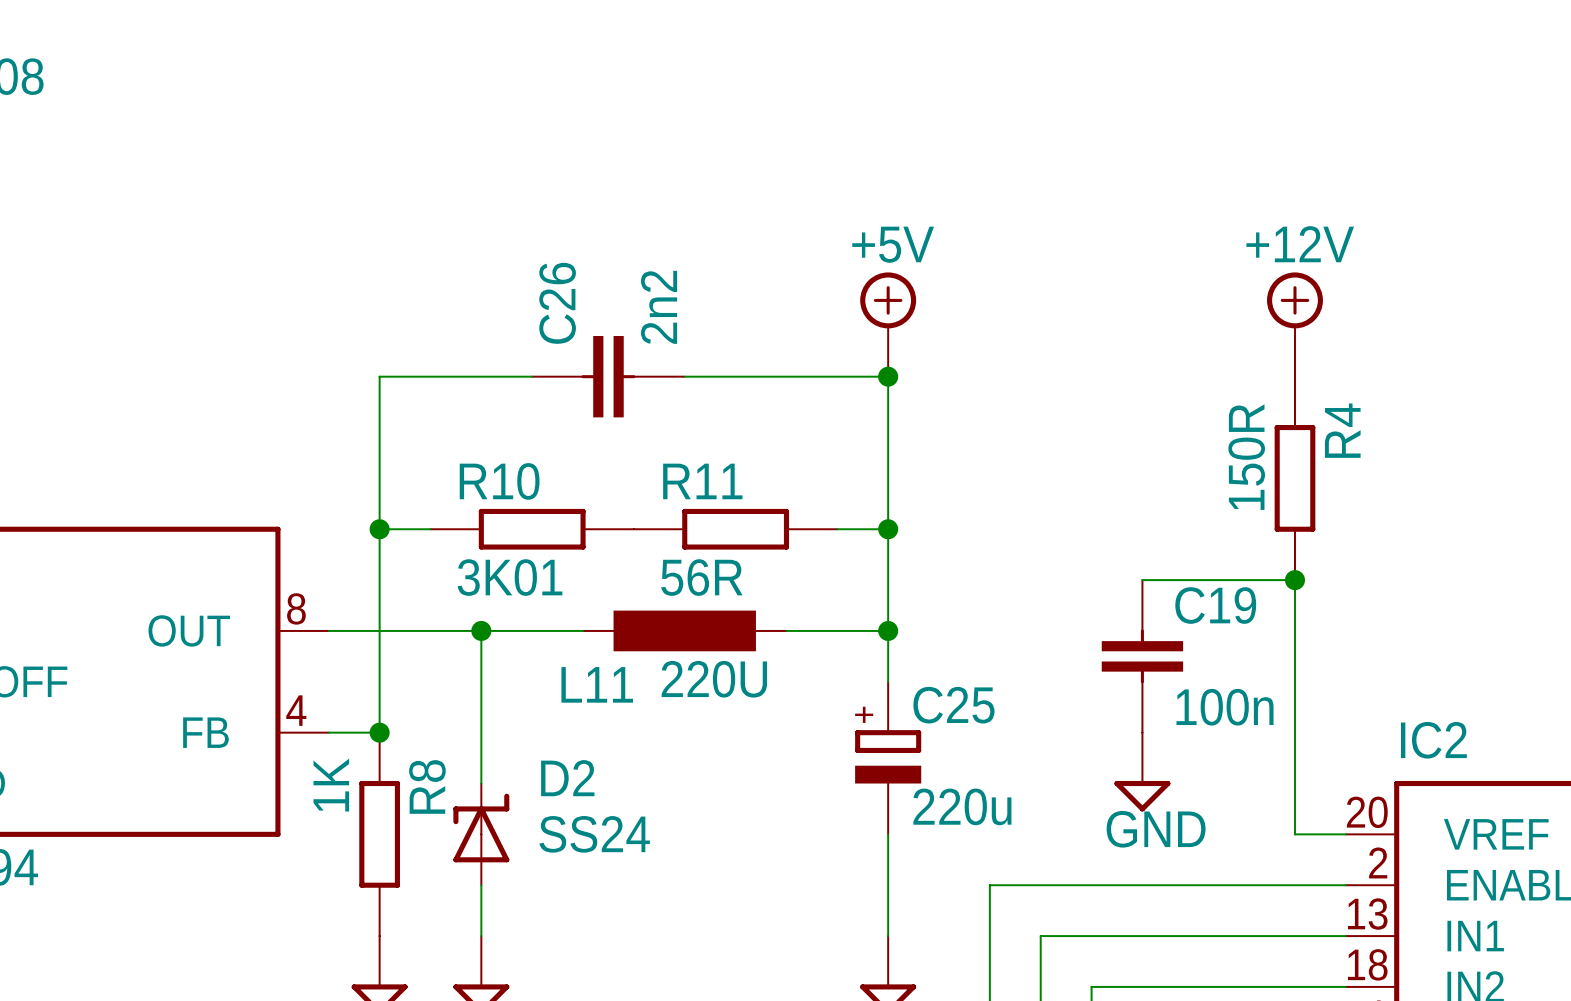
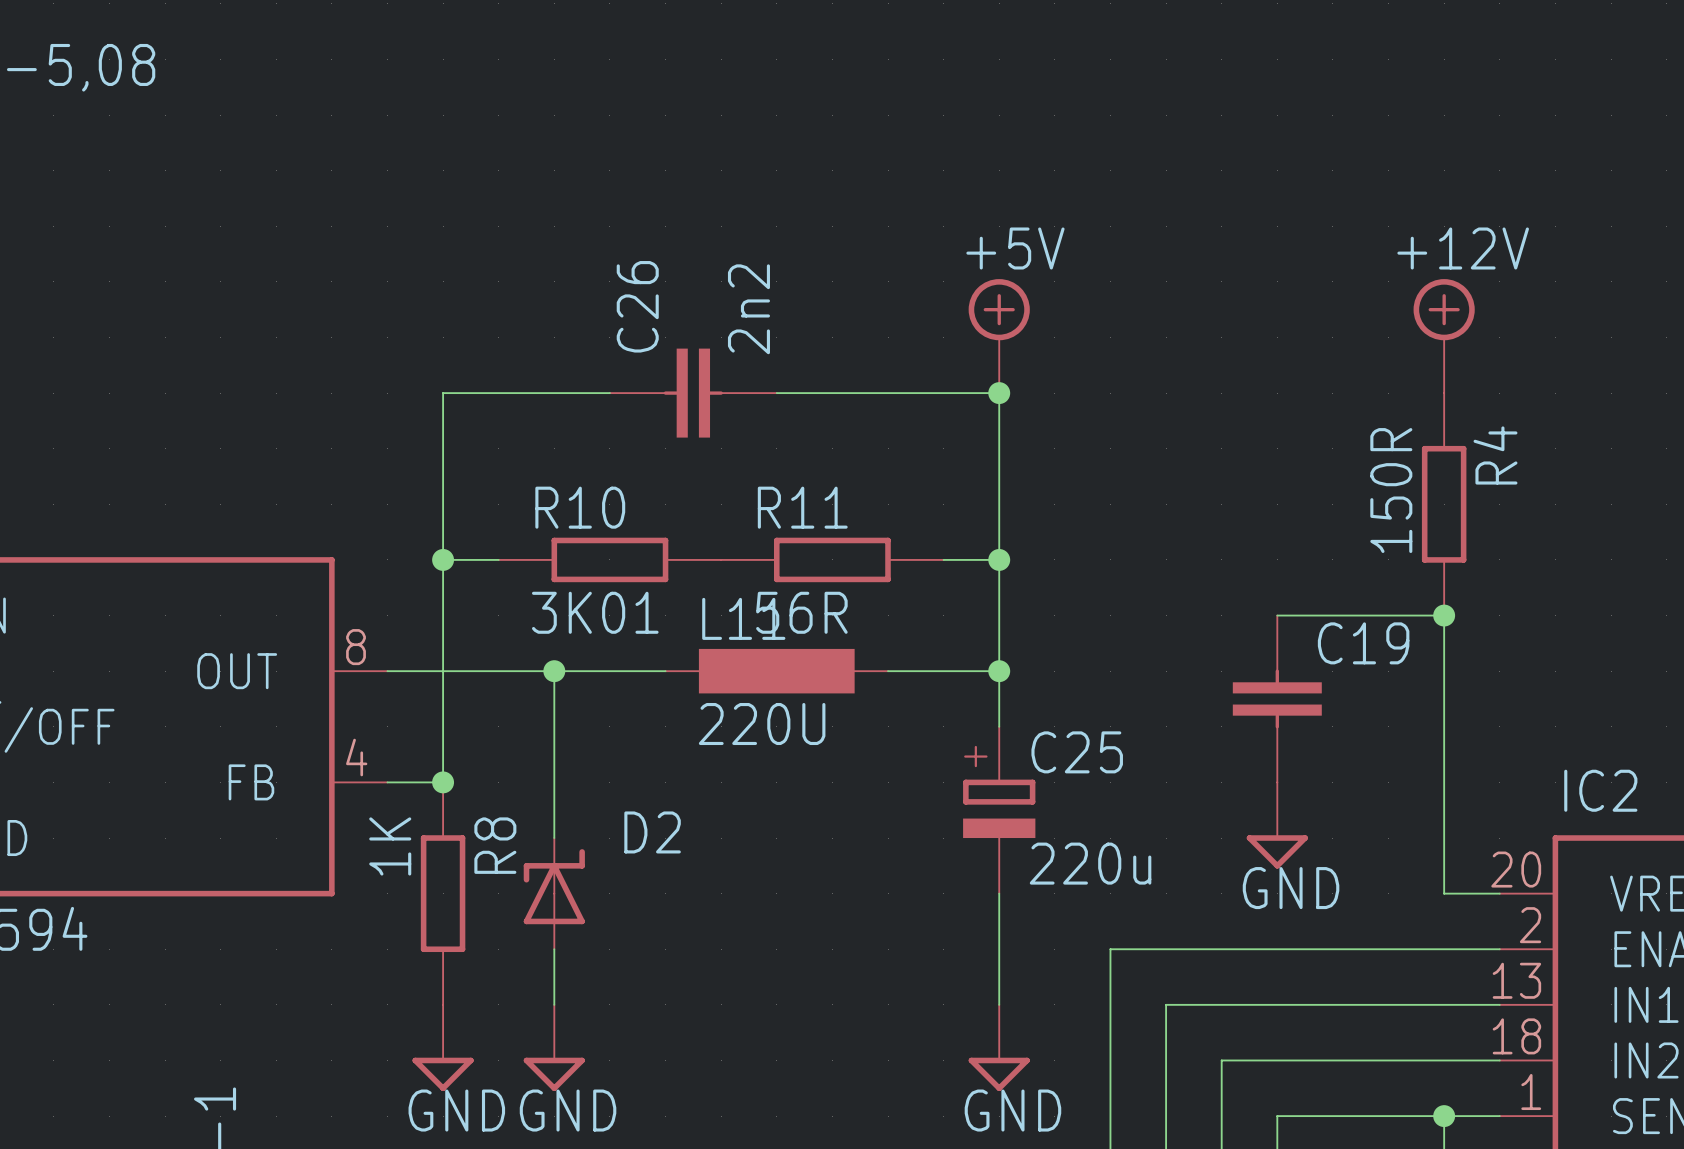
L11 value position: 220U (714, 679) -> 220U (762, 724)
L11 name position: L11 (597, 684) -> L11 (743, 618)
C19 value: 100n (1225, 707) -> none
D2 value: SS24 (594, 834) -> none

